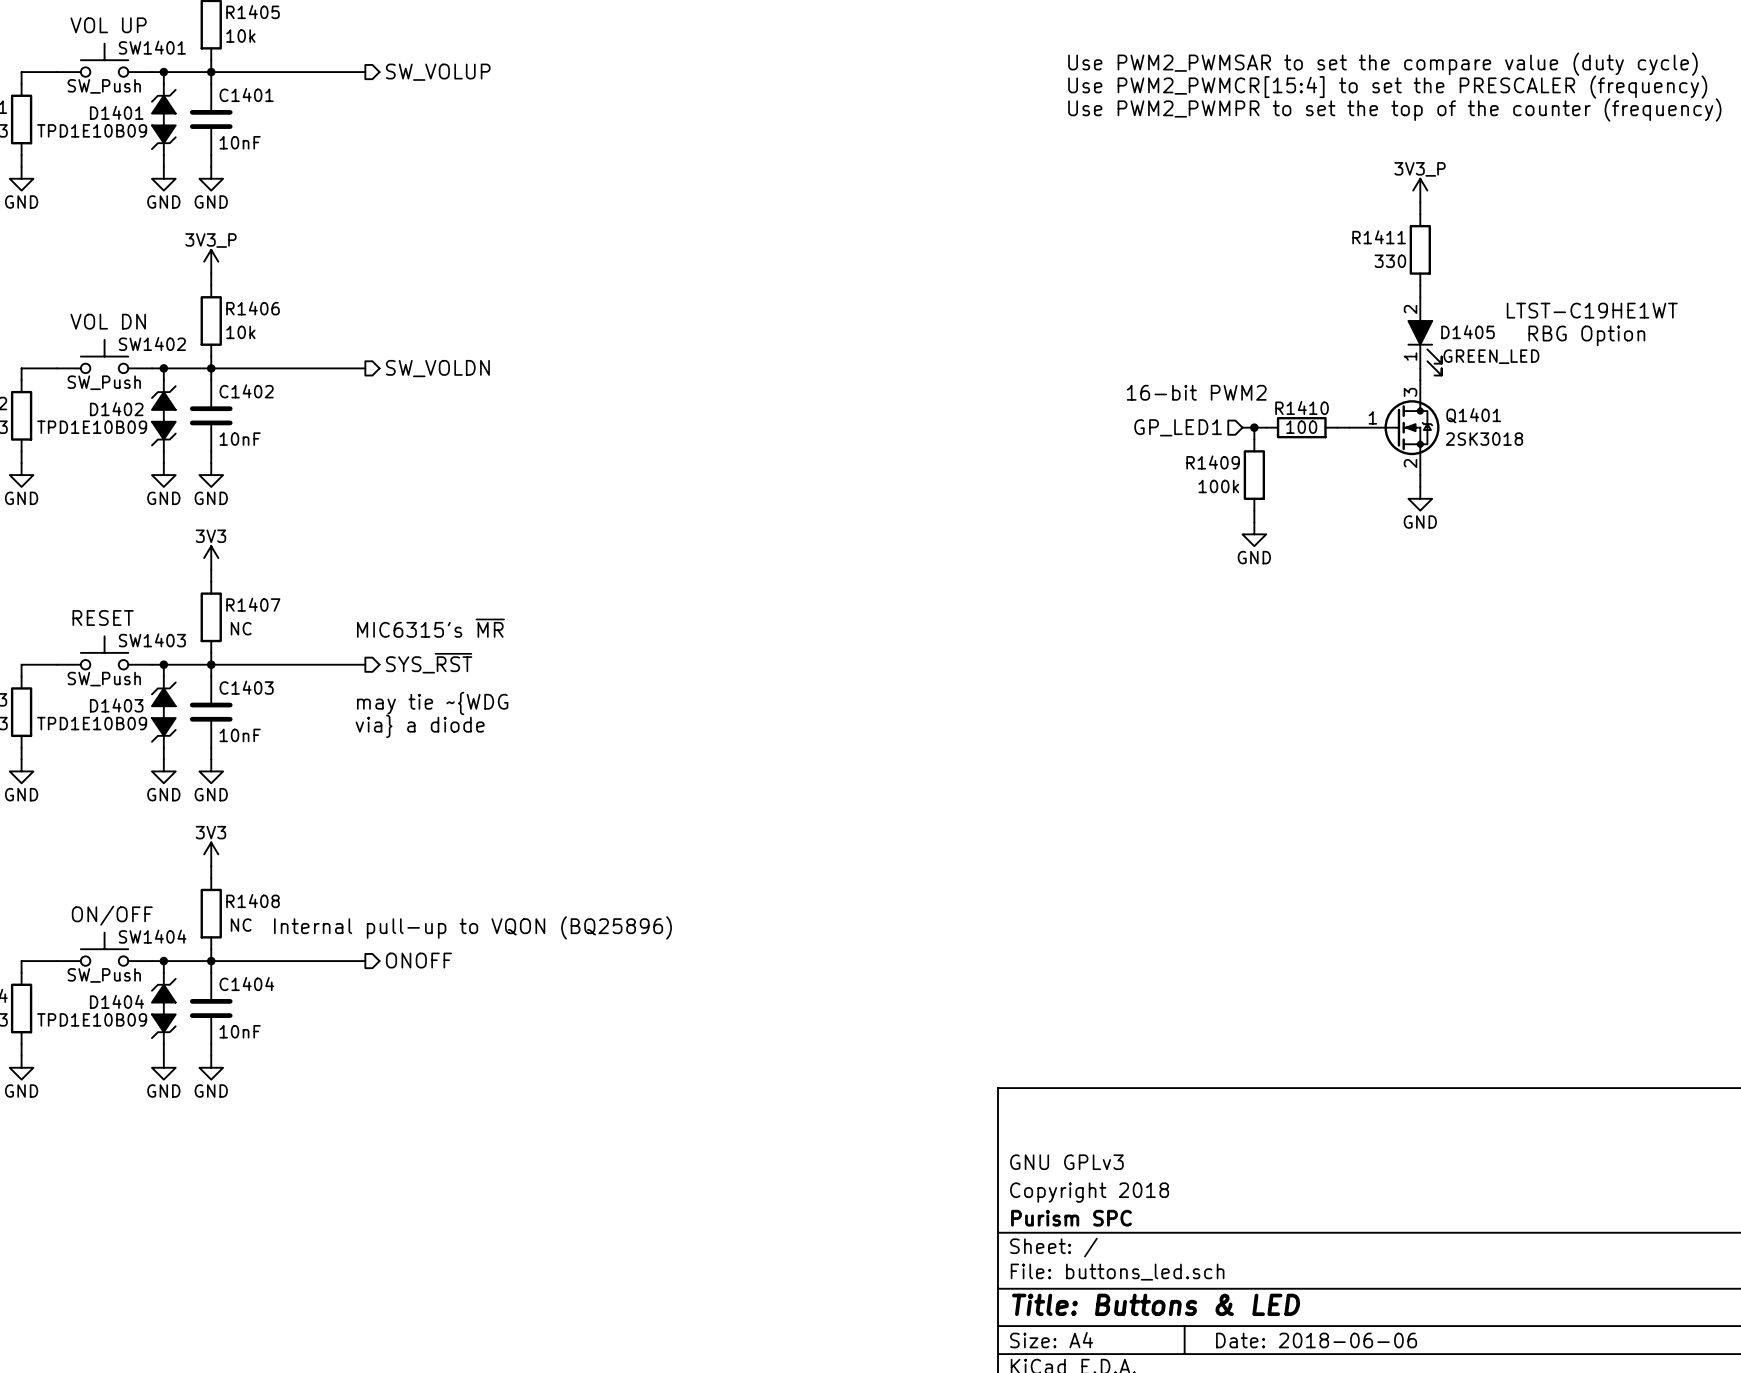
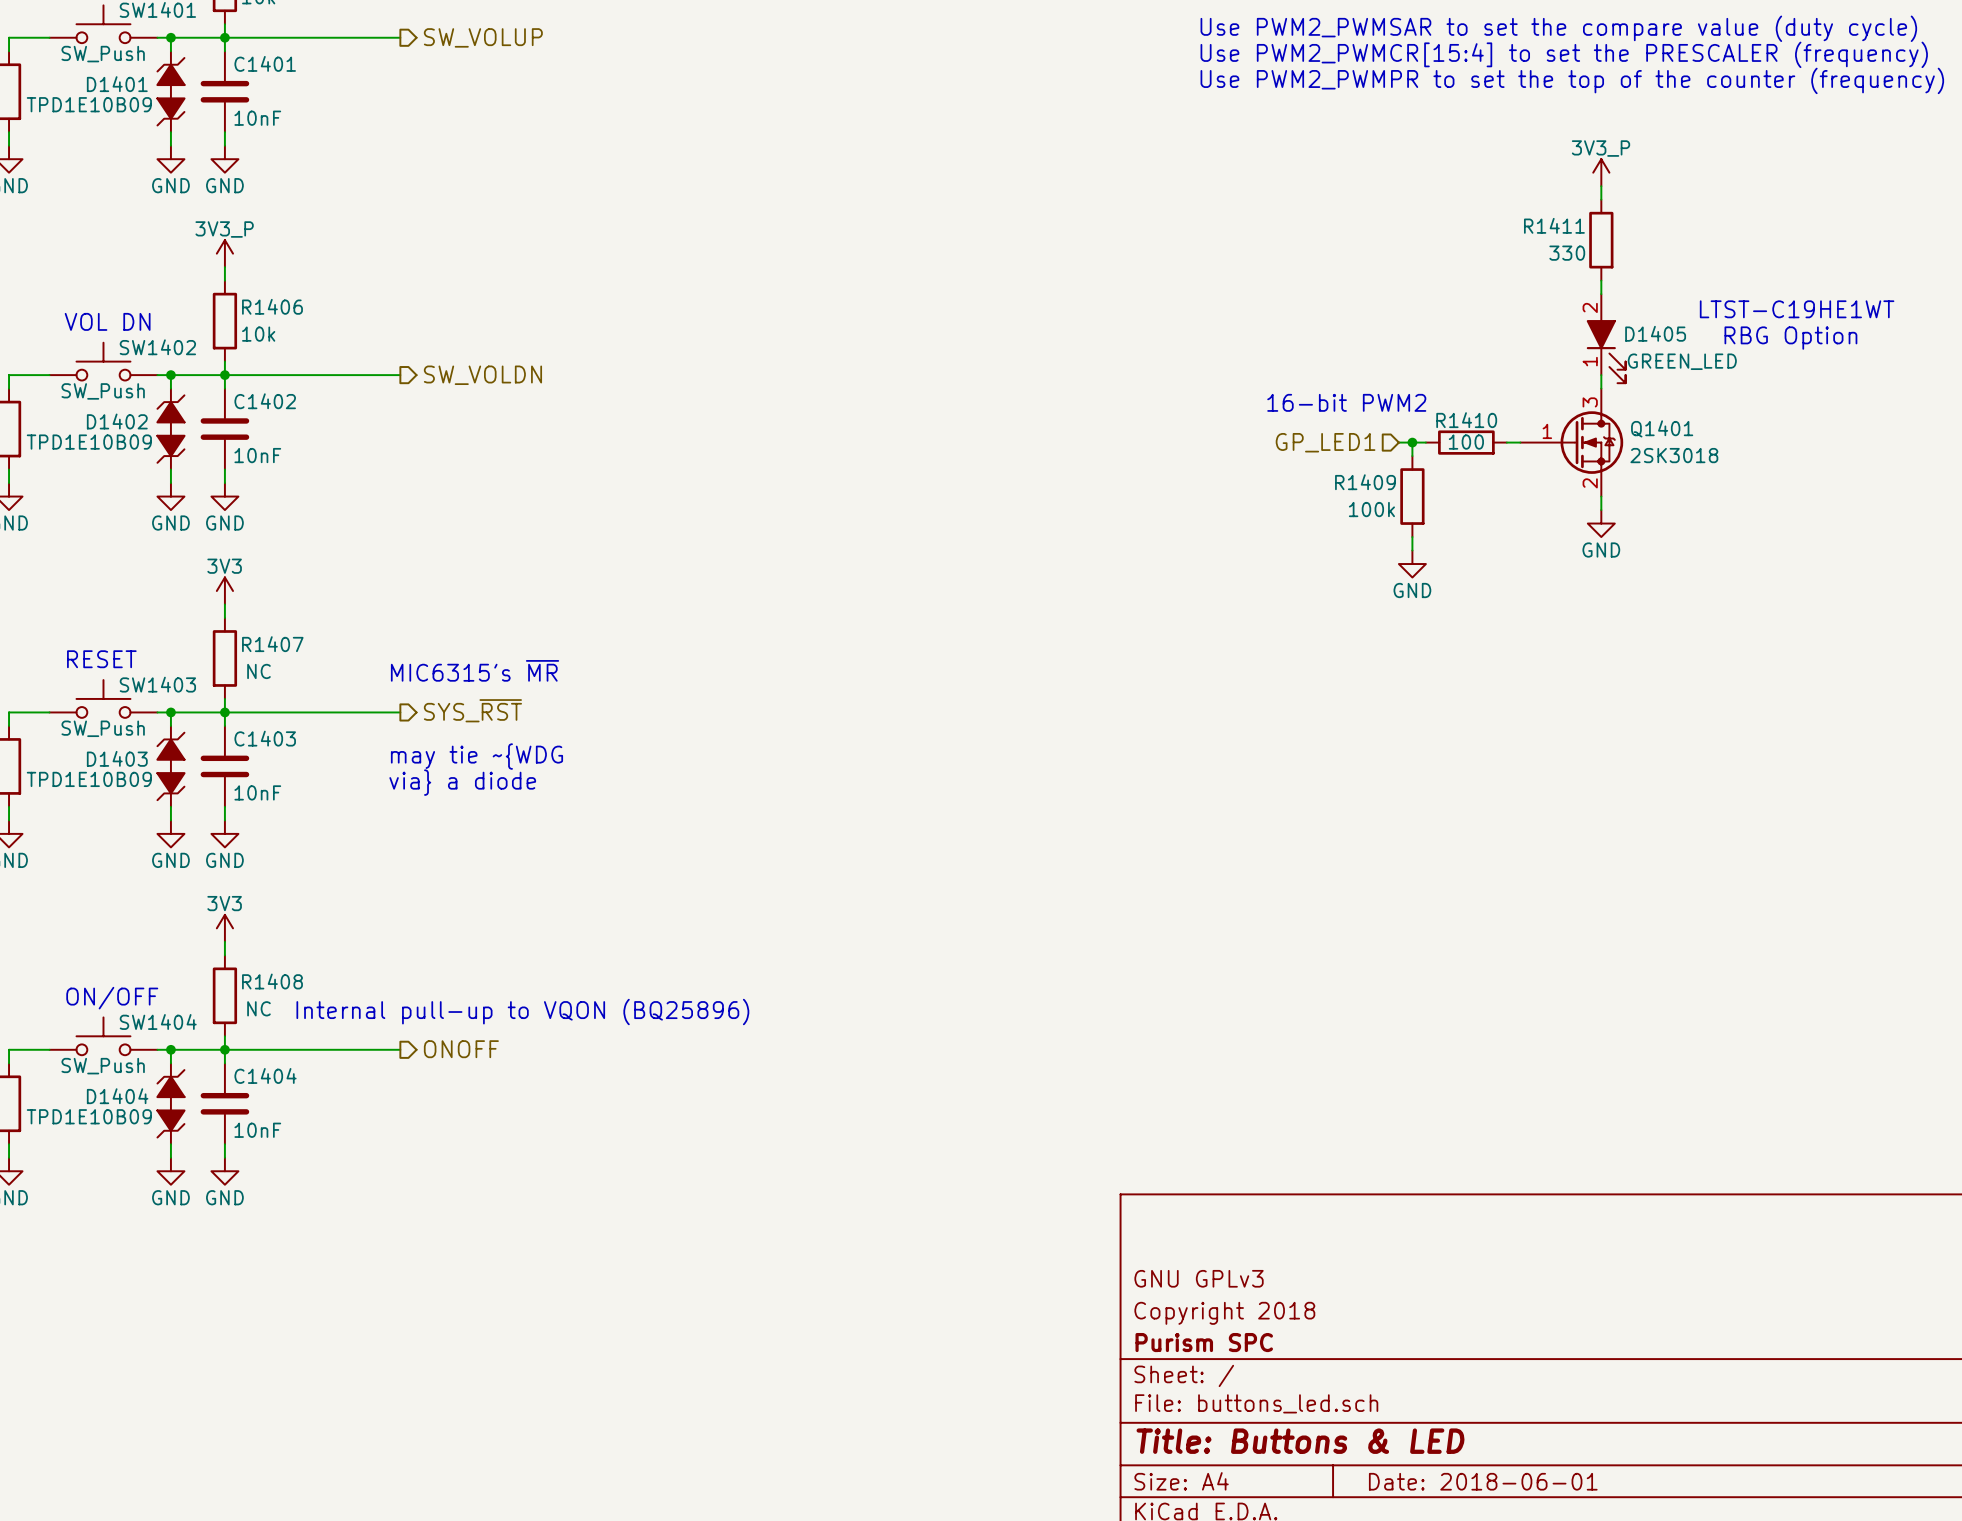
title block: Date: 2018-06-06 (1316, 1340) -> Date: 2018-06-01 (1483, 1481)

